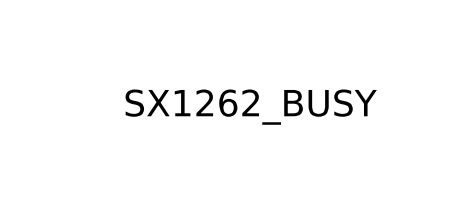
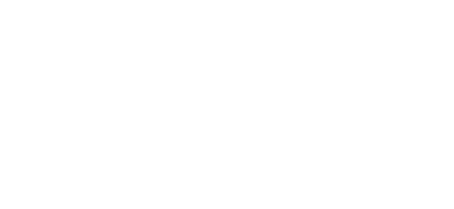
label: SX1262_BUSY (251, 107) -> none

